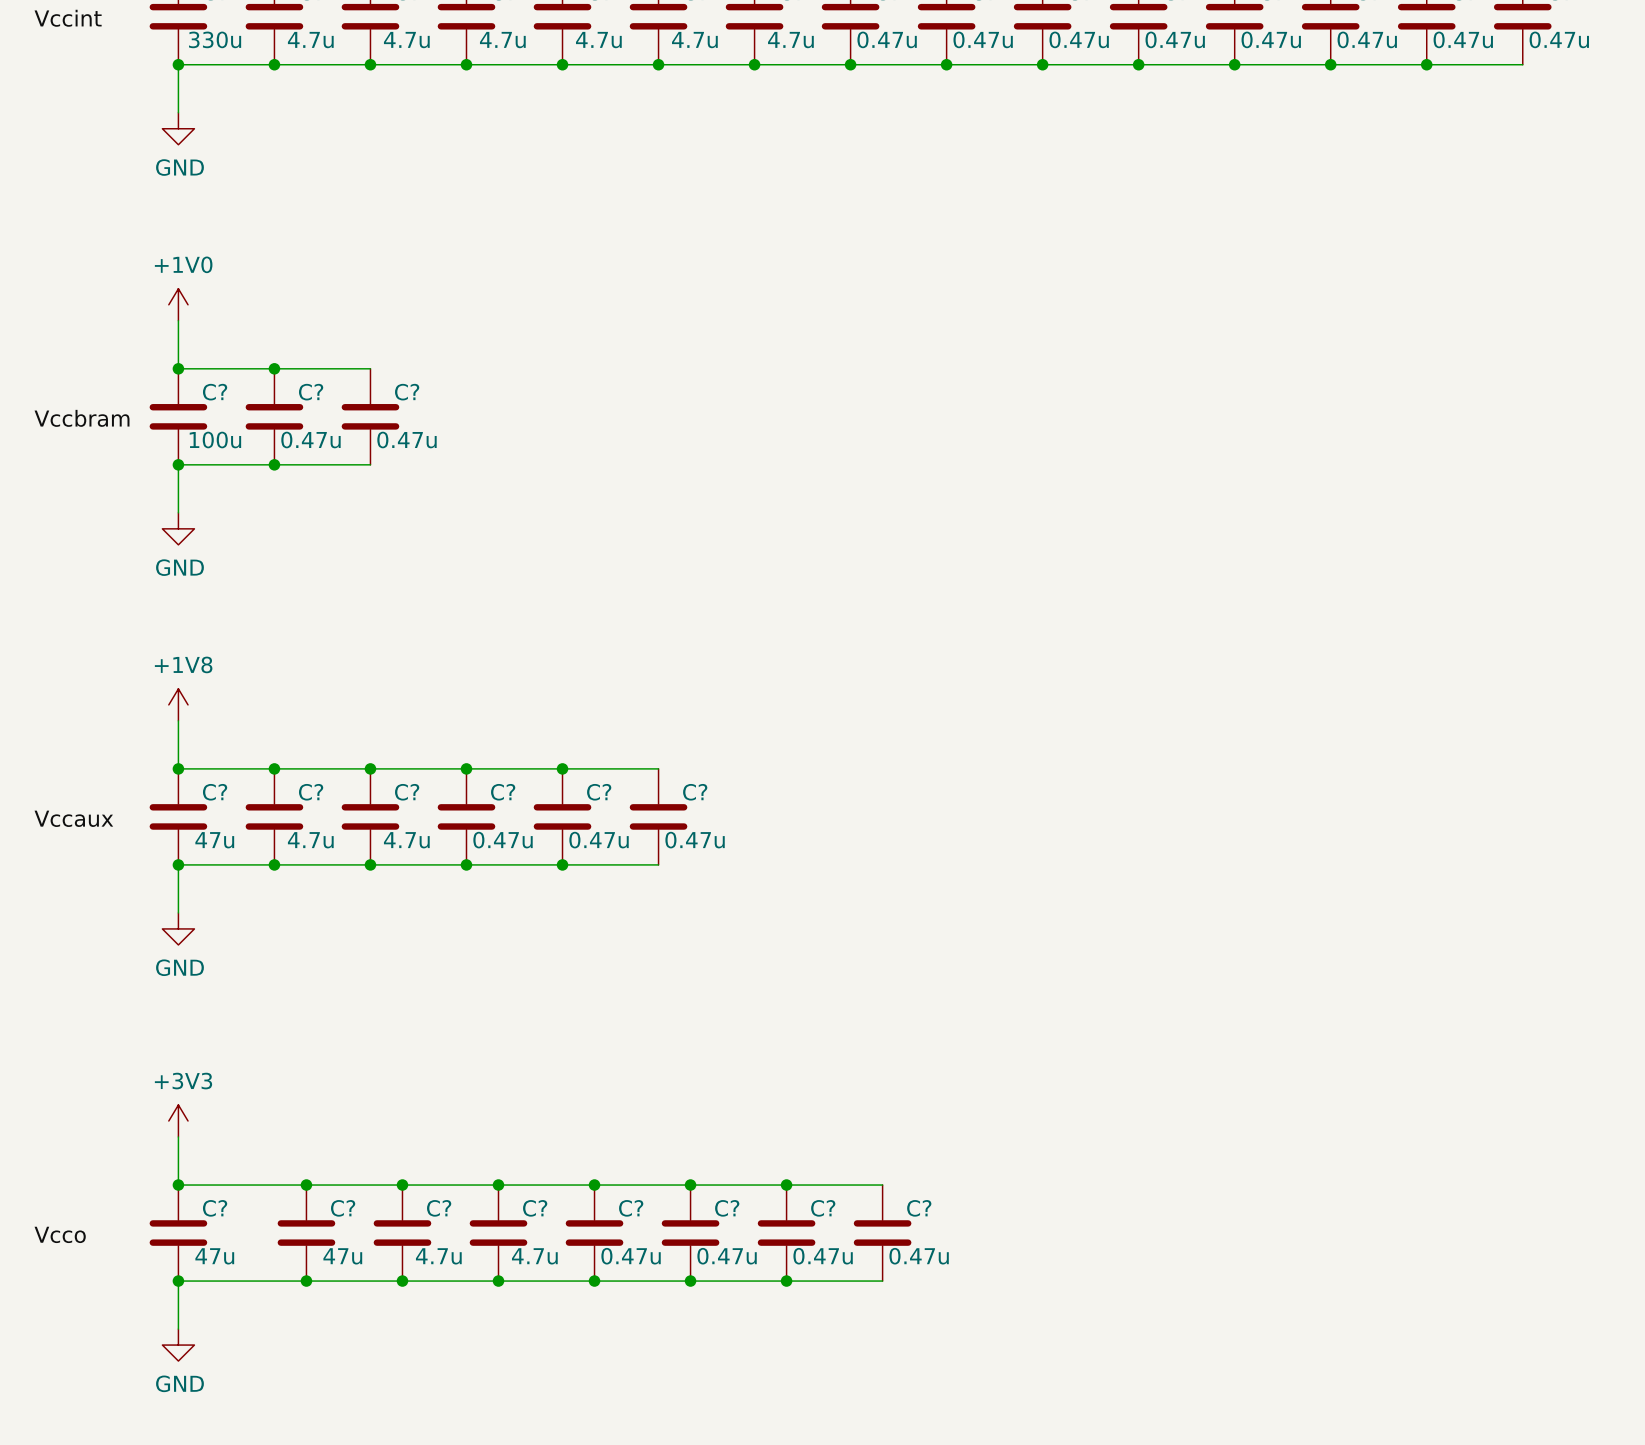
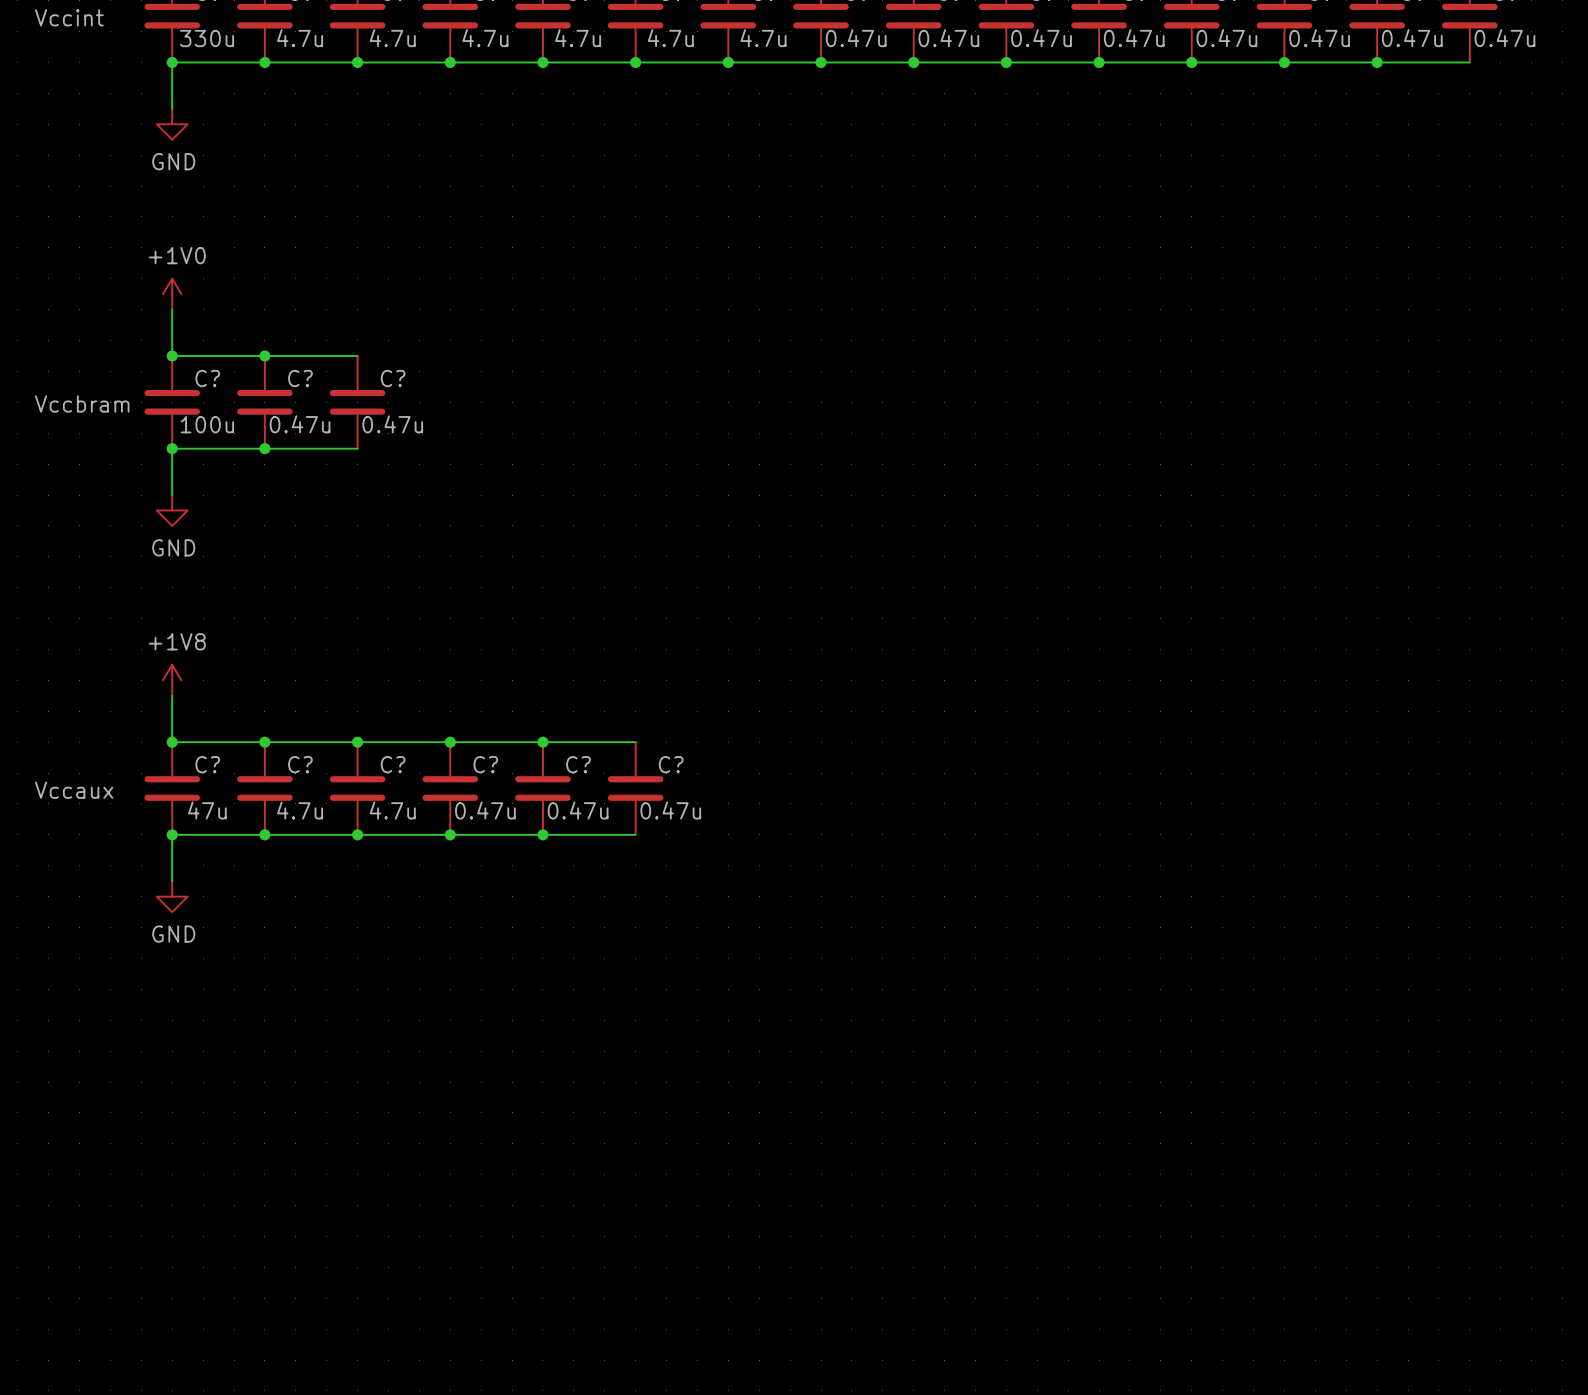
power symbol: +3V3 (178, 1121) -> none
wire: (178, 1137) (178, 1185) (882, 1185) -> none
junction: (178, 1185) -> none
junction: (306, 1185) -> none
junction: (402, 1185) -> none
junction: (498, 1185) -> none
junction: (594, 1185) -> none
junction: (690, 1185) -> none
junction: (786, 1185) -> none
C?: 47u (178, 1233) -> none
C?: 47u (306, 1233) -> none
C?: 4.7u (402, 1233) -> none
C?: 4.7u (498, 1233) -> none
C?: 0.47u (594, 1233) -> none
C?: 0.47u (690, 1233) -> none
C?: 0.47u (786, 1233) -> none
C?: 0.47u (882, 1233) -> none
label: Vcco (60, 1234) -> none
junction: (178, 1281) -> none
junction: (306, 1281) -> none
junction: (402, 1281) -> none
junction: (498, 1281) -> none
junction: (594, 1281) -> none
junction: (690, 1281) -> none
junction: (786, 1281) -> none
wire: (882, 1281) (178, 1281) (178, 1329) -> none
power symbol: GND (178, 1345) -> none

